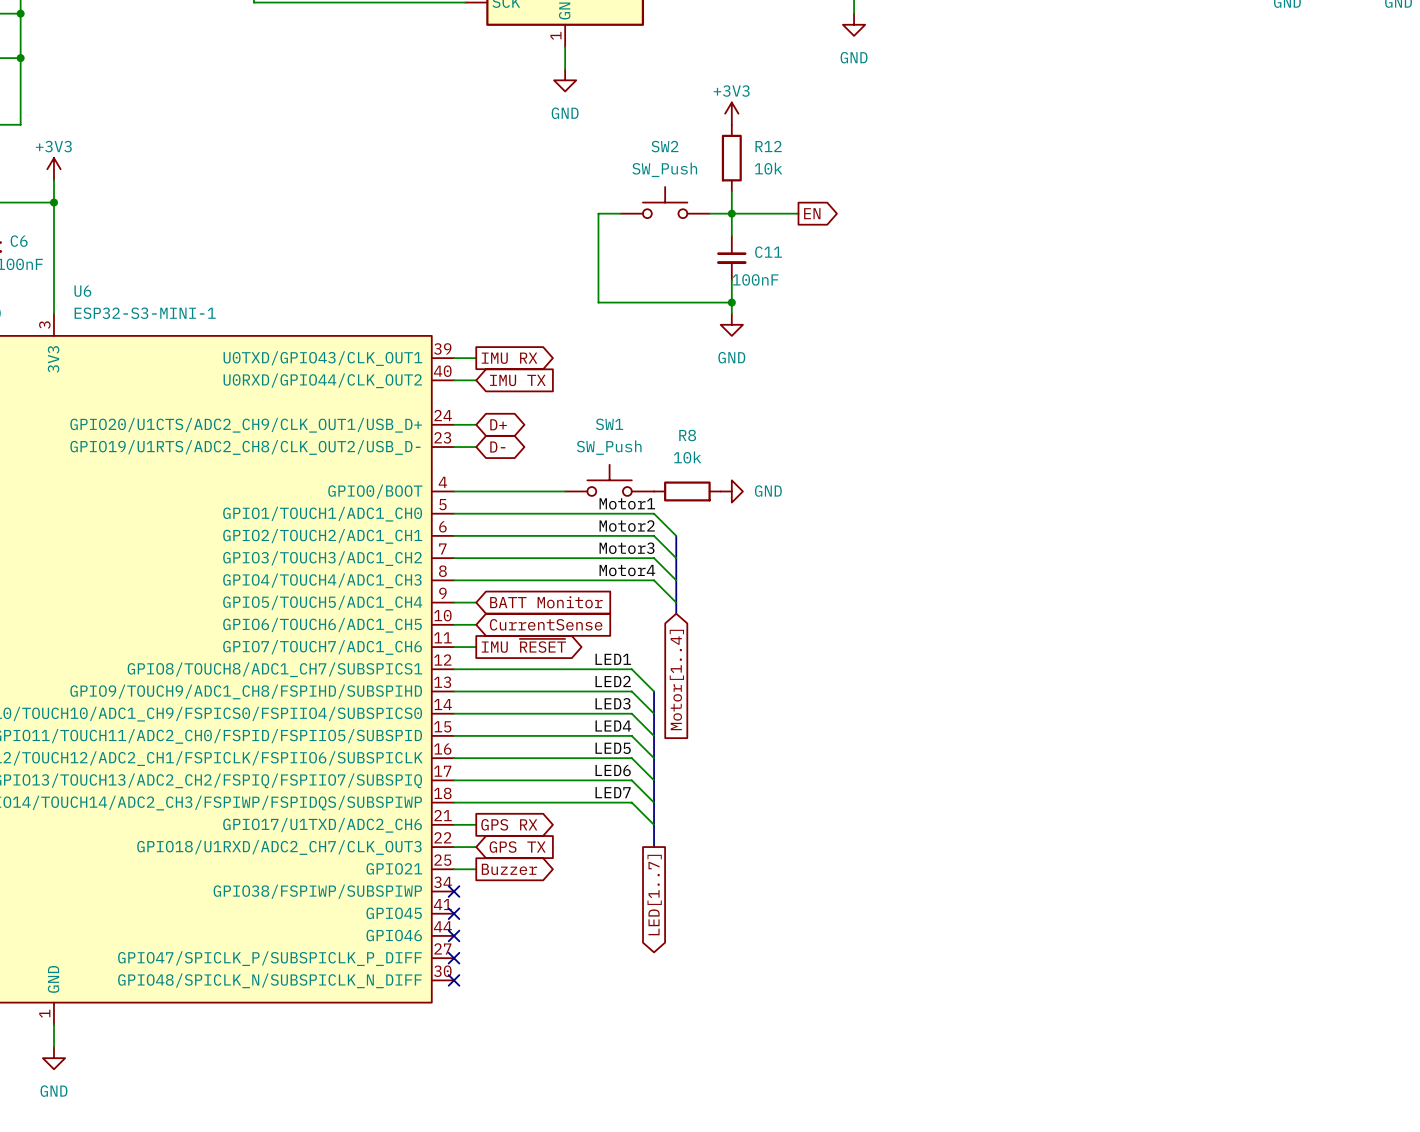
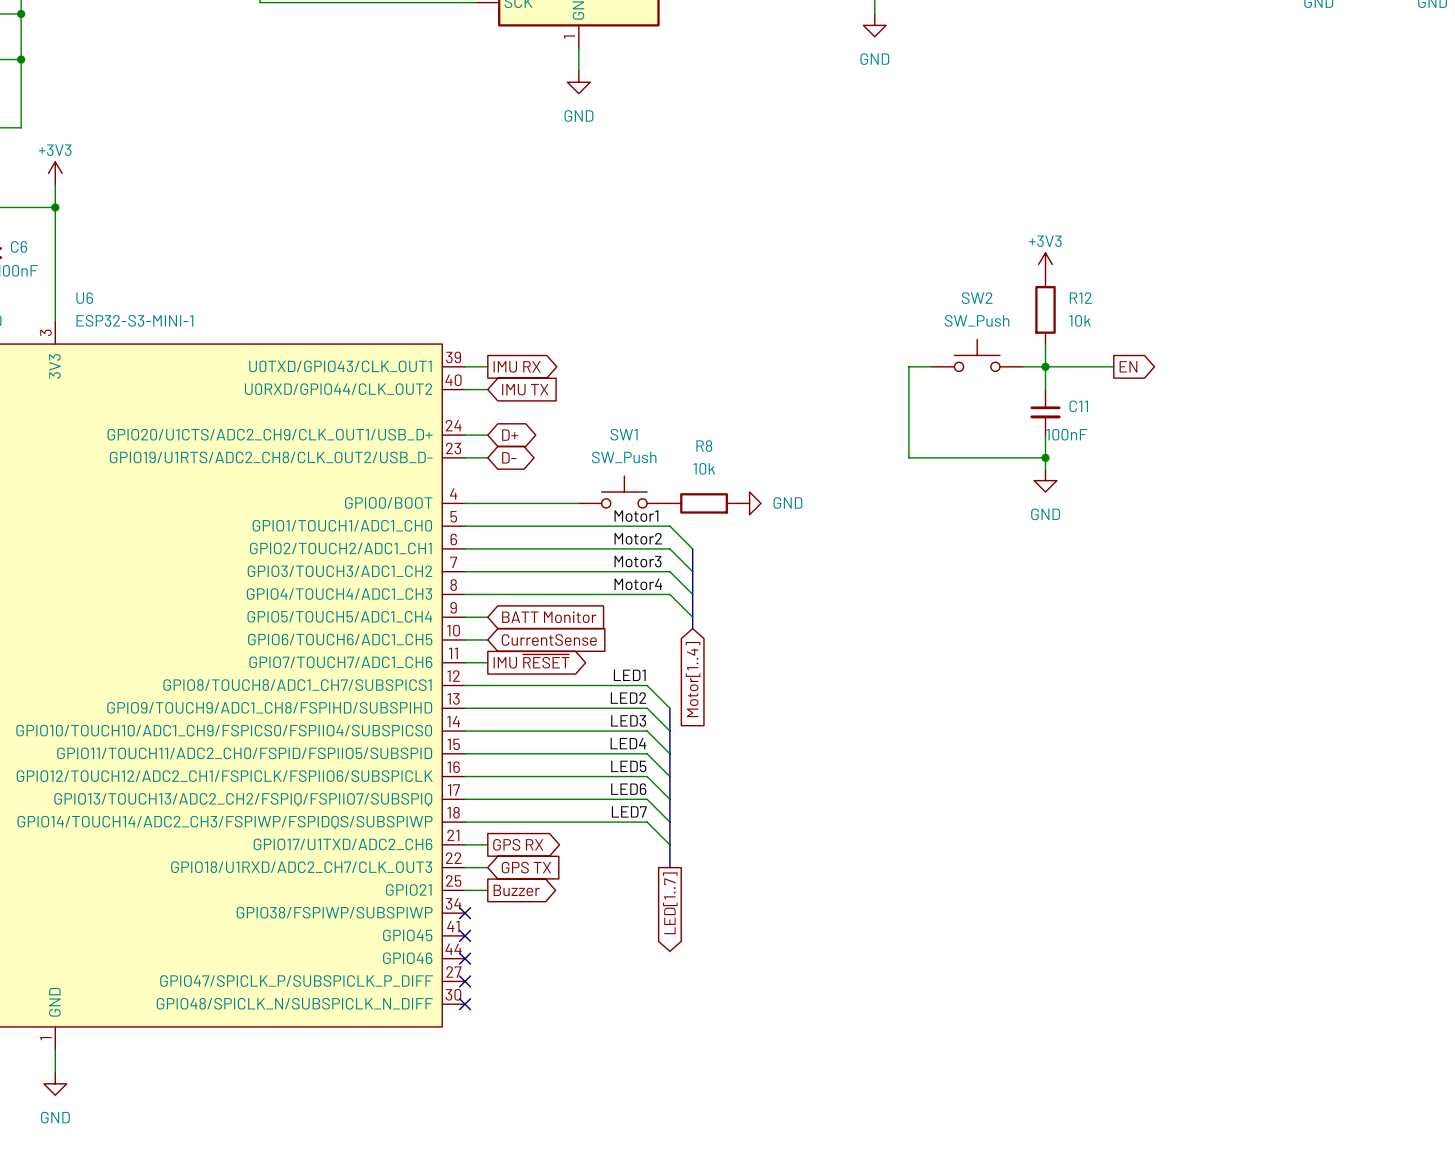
power symbol: +3V3 (731, 113) -> none
R12 position: (731, 158) -> (1045, 309)
wire: (731, 191) (731, 235) -> none
SW2 position: (665, 202) -> (977, 355)
wire: (620, 213) (598, 213) (598, 302) (731, 302) -> none
wire: (709, 213) (798, 213) -> none
junction: (731, 213) -> none
global label: EN (812, 213) -> none
C11 position: (731, 258) -> (1045, 412)
power symbol: none -> +3V3 (1045, 264)
wire: (731, 280) (731, 313) -> none
junction: (731, 302) -> none
power symbol: GND (731, 324) -> none
wire: none -> (1045, 344) (1045, 389)
wire: none -> (931, 366) (908, 366) (908, 457) (1045, 457)
wire: none -> (1022, 366) (1113, 366)
junction: none -> (1045, 366)
global label: none -> EN (1128, 366)
wire: none -> (1045, 435) (1045, 469)
junction: none -> (1045, 457)
power symbol: none -> GND (1045, 480)

